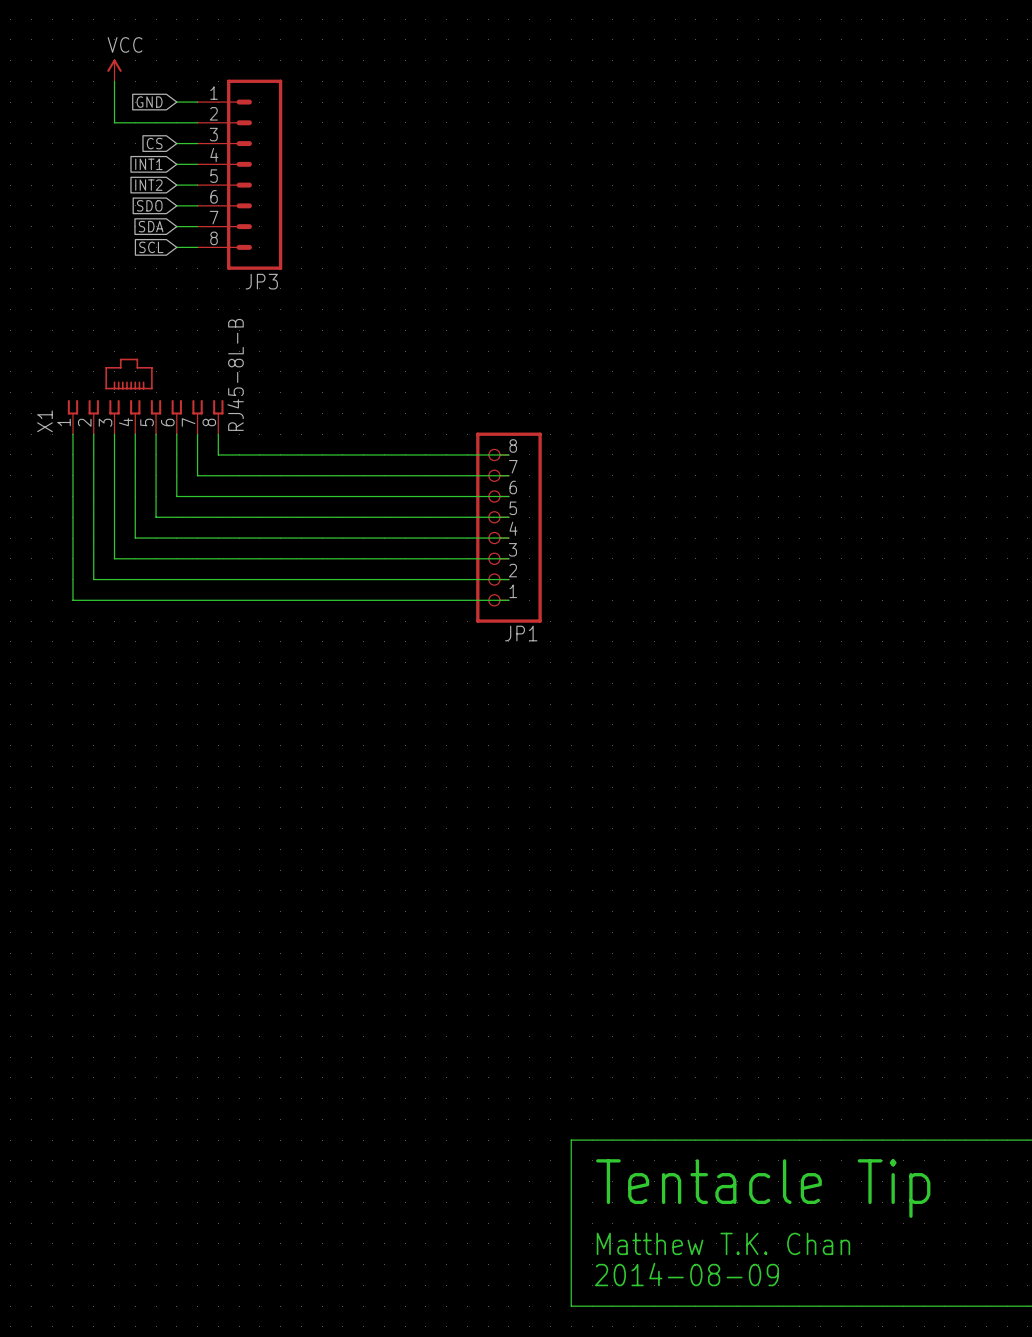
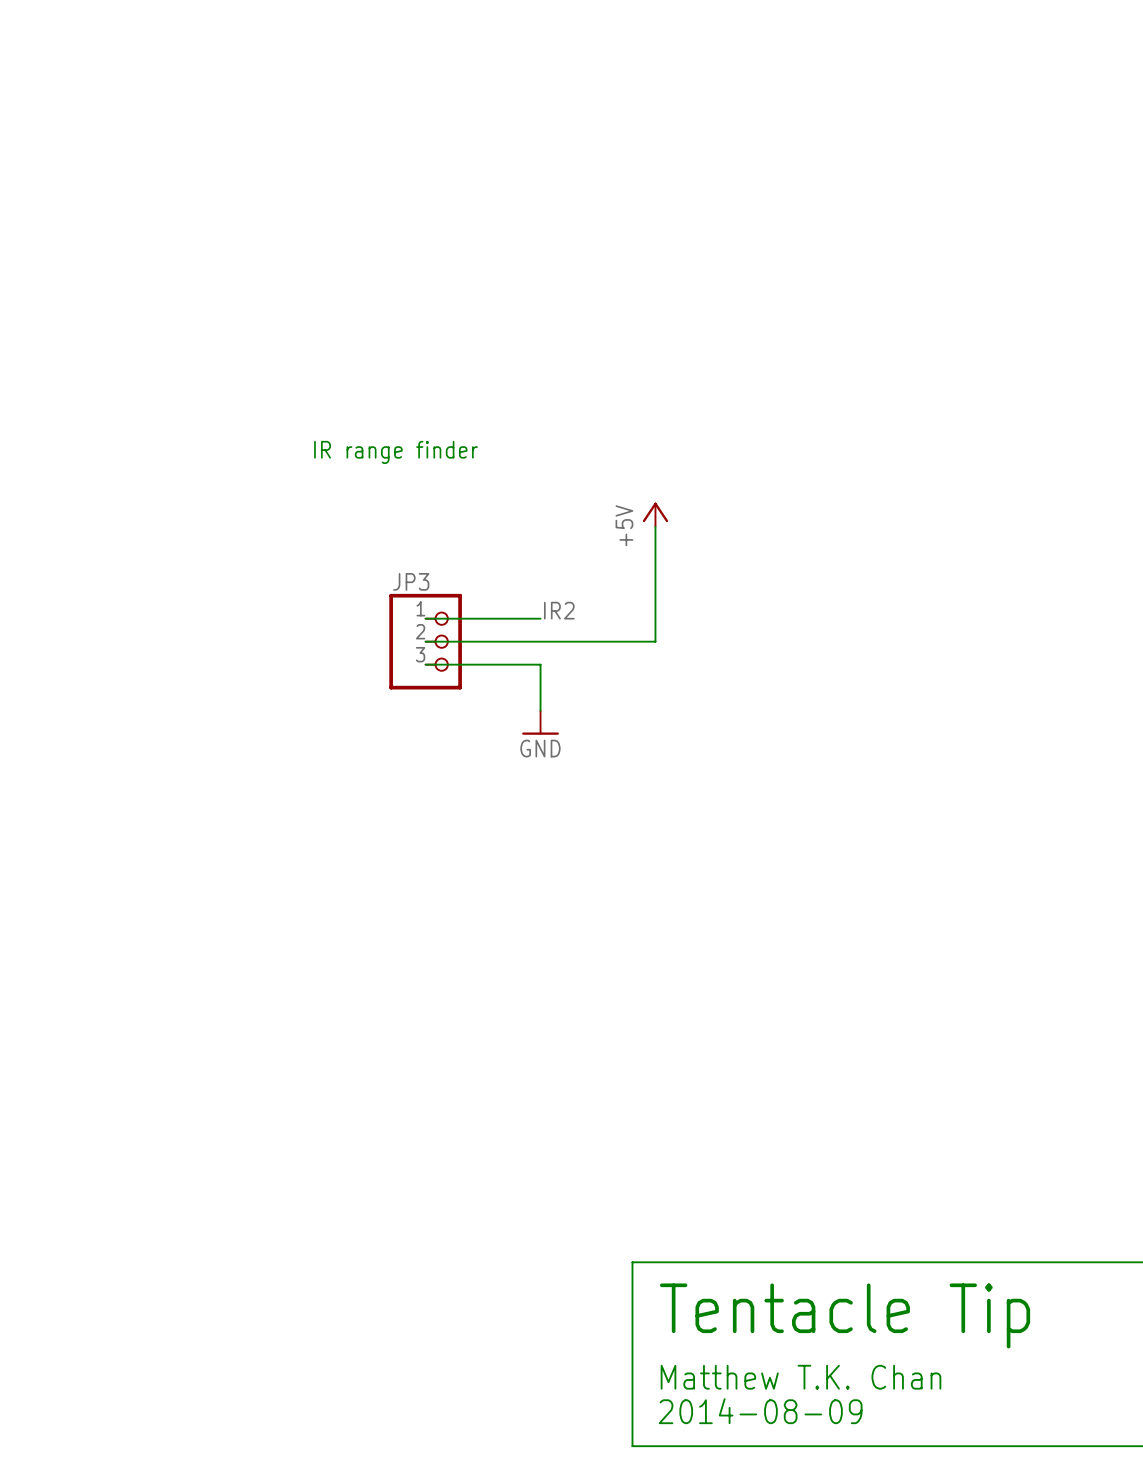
power symbol: VCC (114, 70) -> none
JP3 symbol: [197, 79, 283, 270] -> [389, 593, 462, 690]
wire: (114, 81) (114, 122) (197, 122) -> none
global label: GND (149, 102) -> none
wire: (176, 102) (197, 102) -> none
global label: CS (154, 143) -> none
wire: (176, 143) (197, 143) -> none
global label: INT1 (148, 164) -> none
wire: (176, 164) (197, 164) -> none
global label: INT2 (148, 185) -> none
wire: (176, 185) (197, 185) -> none
global label: SDO (149, 205) -> none
wire: (176, 205) (197, 205) -> none
global label: SDA (151, 226) -> none
wire: (176, 226) (197, 226) -> none
global label: SCL (151, 247) -> none
wire: (176, 247) (197, 247) -> none
JP3 name position: JP3 (261, 281) -> JP3 (411, 581)
X1: RJ45-8L-B (145, 396) -> none
text: none -> IR range finder (395, 452)
wire: (72, 434) (72, 600) (384, 600) -> none
wire: (93, 434) (93, 579) (384, 579) -> none
wire: (114, 434) (114, 558) (384, 558) -> none
wire: (135, 434) (135, 538) (508, 538) -> none
wire: (156, 434) (156, 517) (508, 517) -> none
wire: (176, 434) (176, 496) (508, 496) -> none
wire: (197, 434) (197, 475) (508, 475) -> none
wire: (218, 434) (218, 454) (508, 454) -> none
power symbol: none -> +5V (655, 514)
wire: none -> (655, 526) (655, 641) (563, 641)
JP1: (508, 527) -> none
label: none -> IR2 (559, 610)
wire: (488, 558) (508, 558) -> none
wire: (488, 600) (508, 600) -> (540, 664) (540, 710)
power symbol: none -> GND (540, 722)

